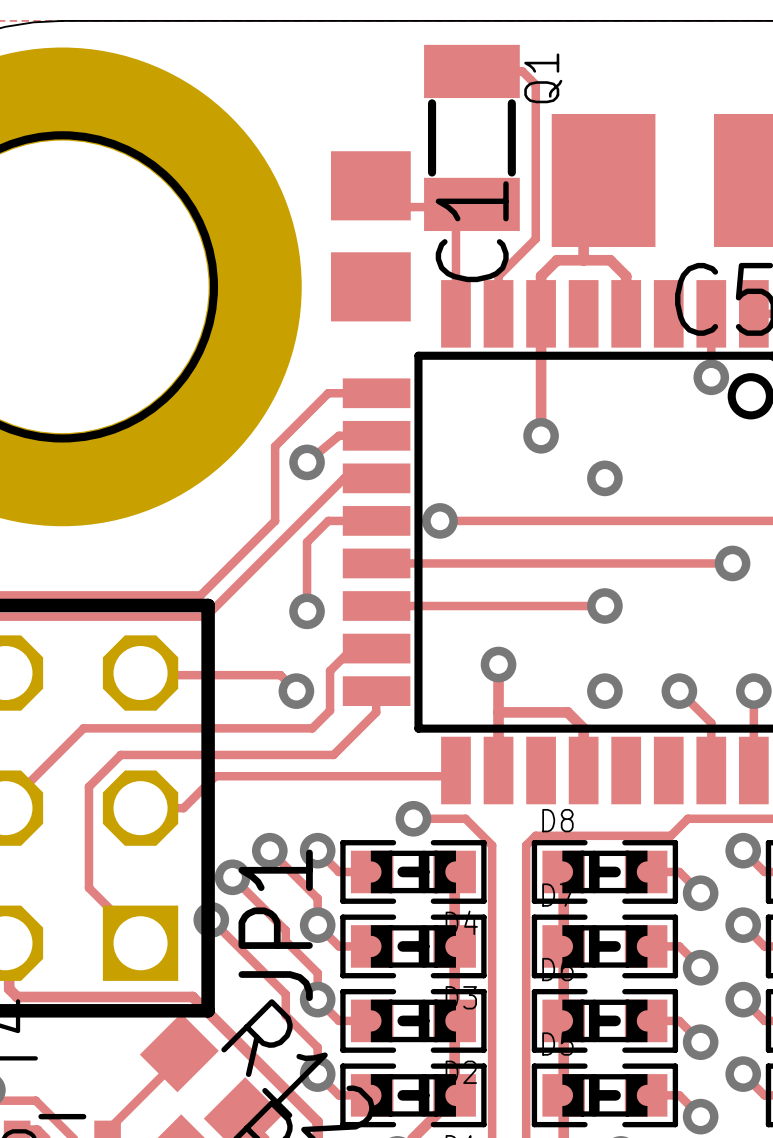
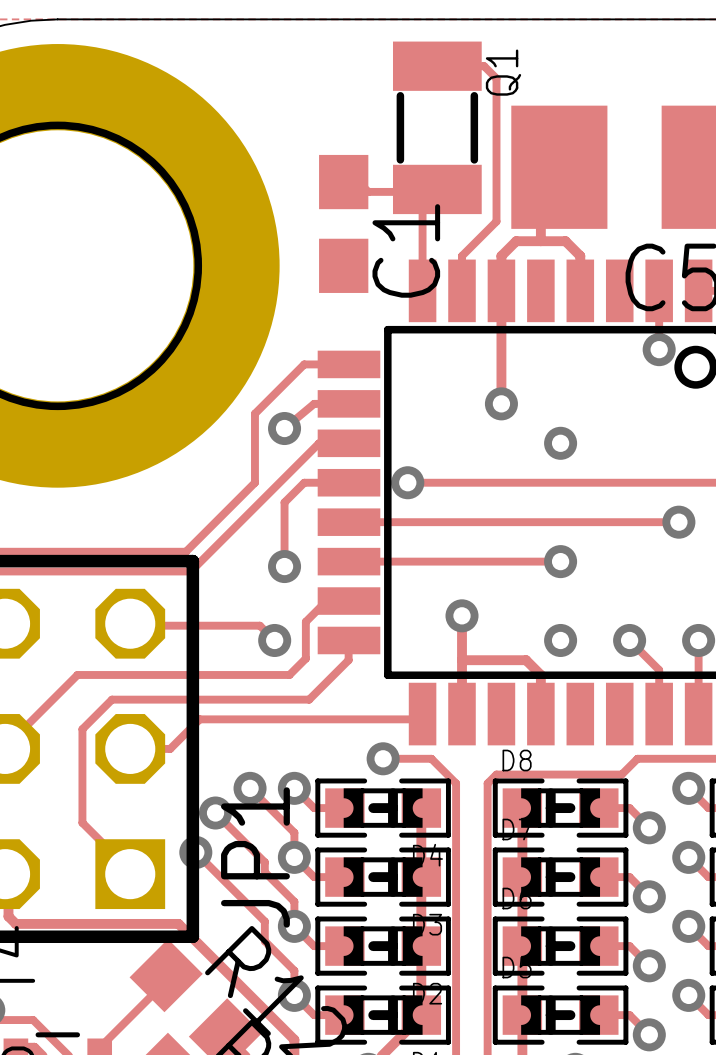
C1 footprint: [330, 151, 411, 322] -> [319, 154, 369, 293]
C1 name position: C1 (472, 231) -> C1 (406, 250)

